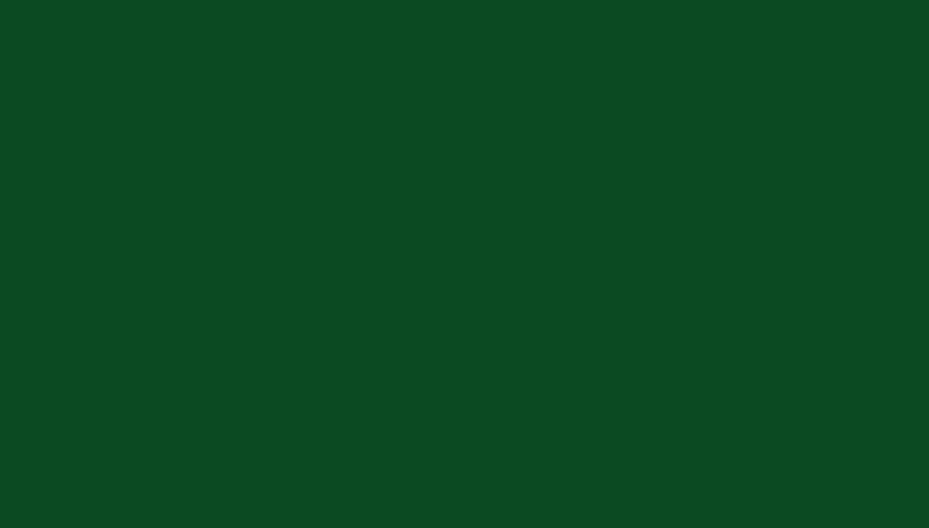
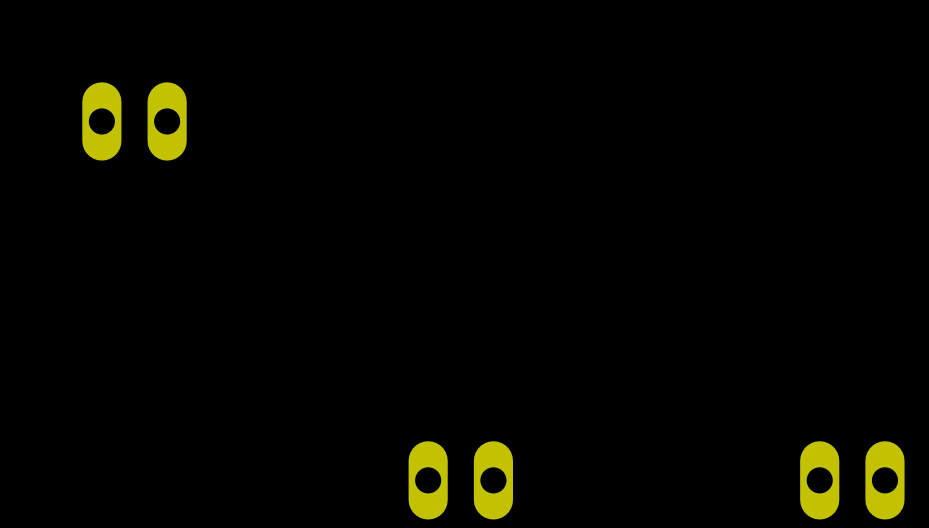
part: none -> (134, 121)
part: none -> (460, 480)
part: none -> (852, 480)

